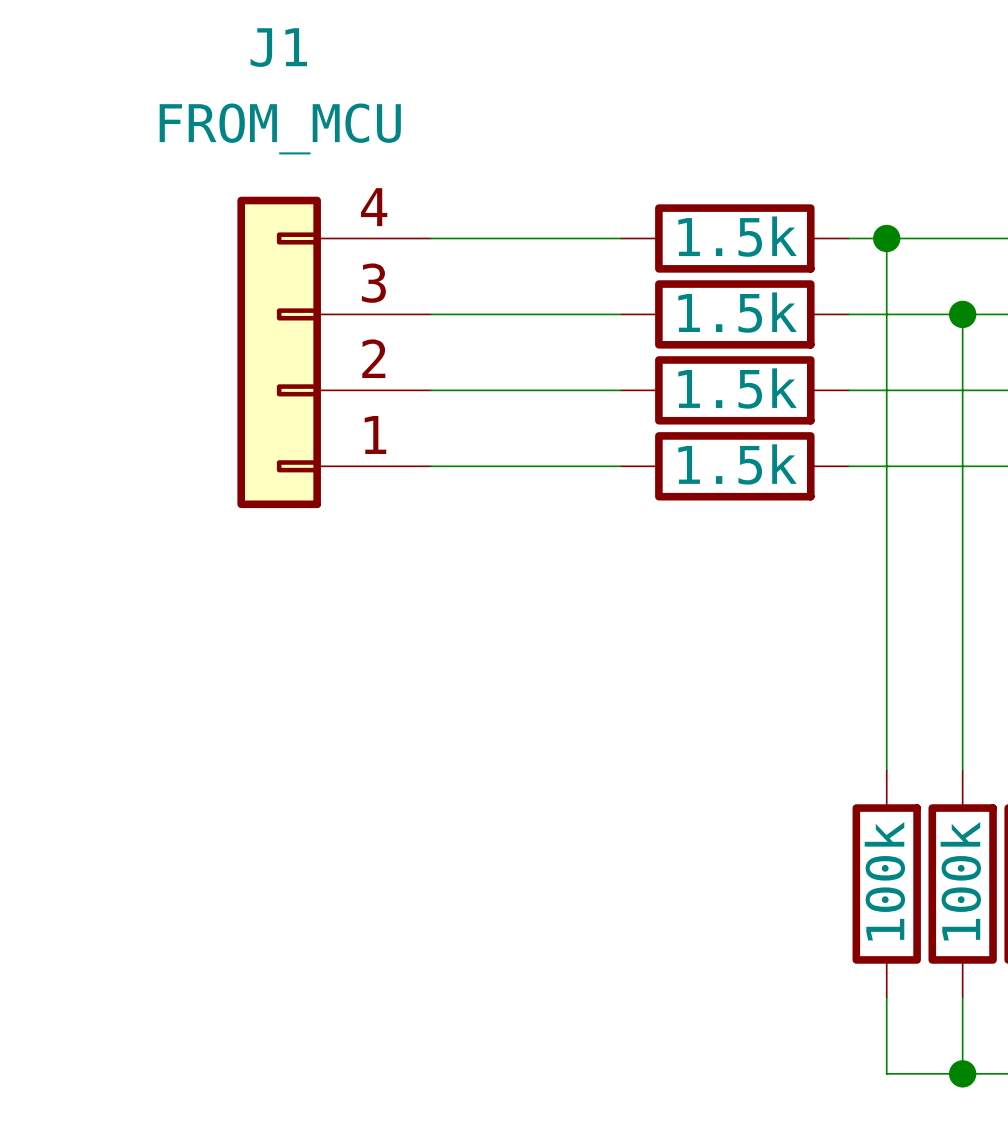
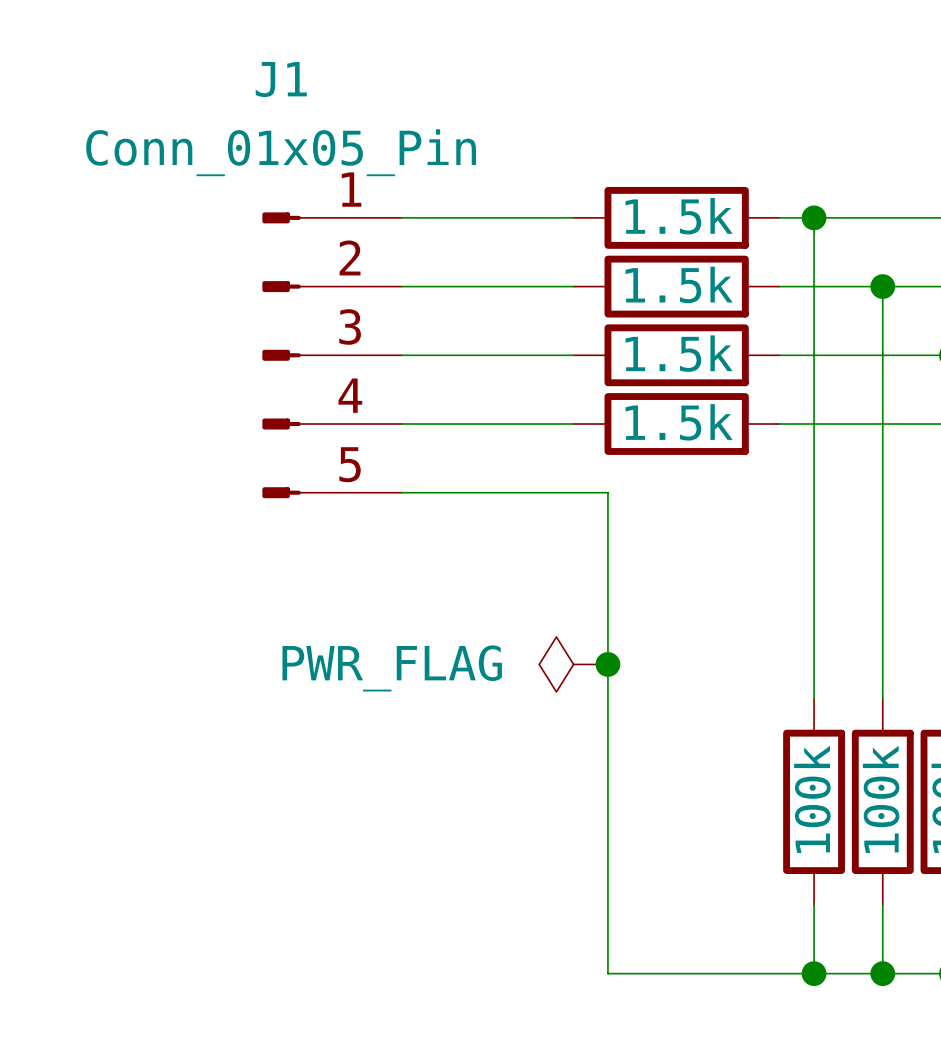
J1 value: FROM_MCU (280, 128) -> Conn_01x05_Pin (281, 152)
J1 symbol: [237, 196, 432, 509] -> [262, 212, 402, 499]
wire: none -> (401, 492) (607, 492) (607, 973) (814, 973)
power symbol: none -> PWR_FLAG (573, 664)
junction: none -> (607, 664)
junction: none -> (814, 973)

